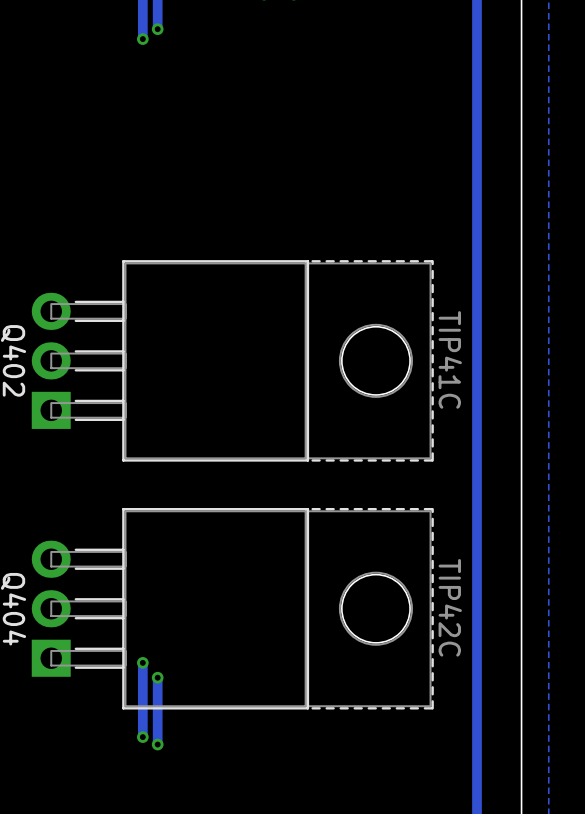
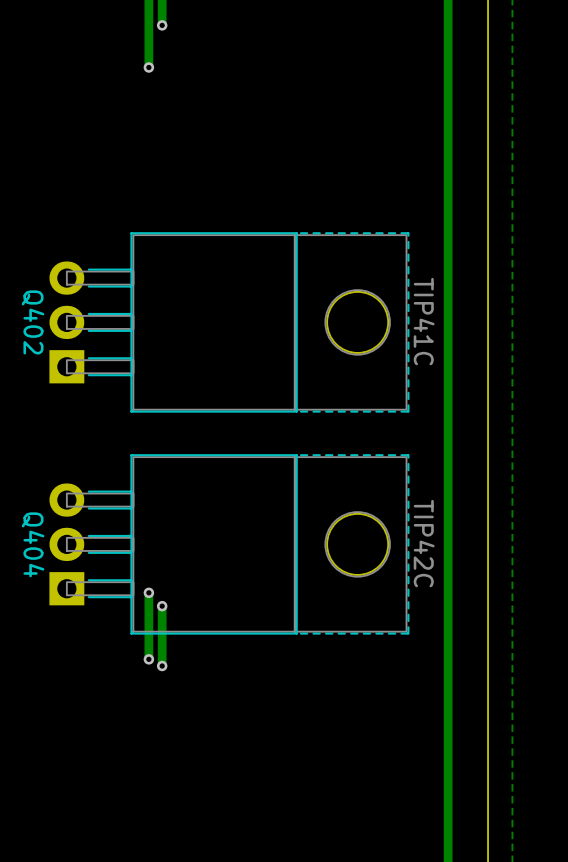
track: none -> (148, 34) (148, 67)
via position: (142, 39) -> (148, 67)

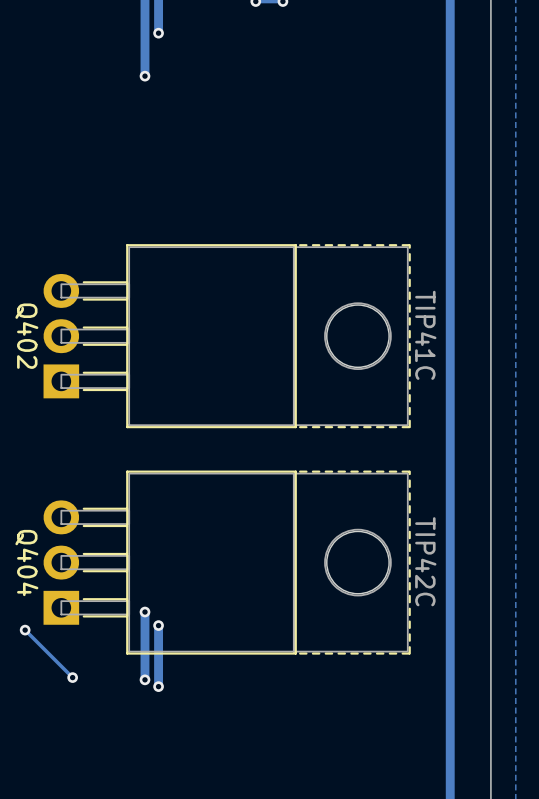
track: none -> (25, 630) (72, 677)
via: none -> (25, 630)
via: none -> (72, 677)

